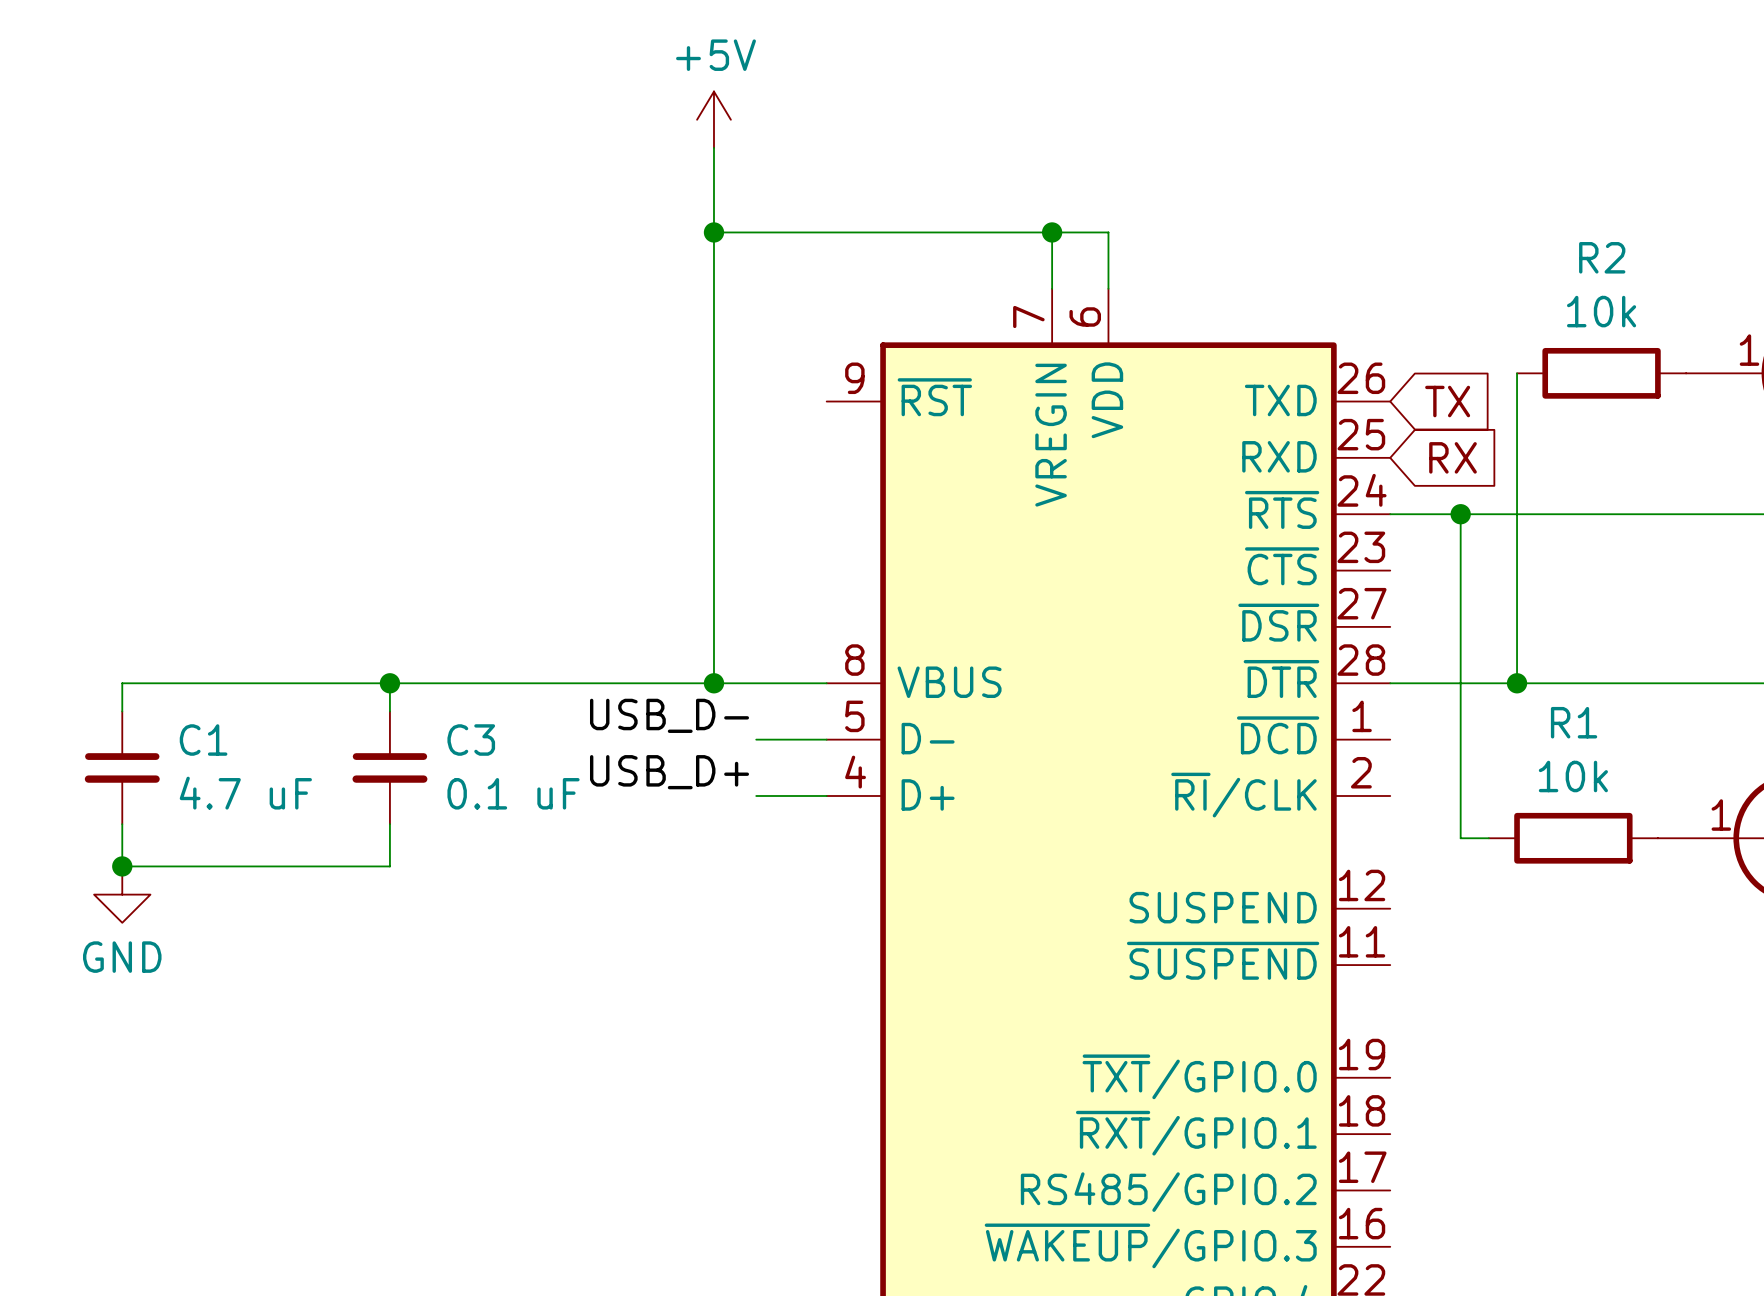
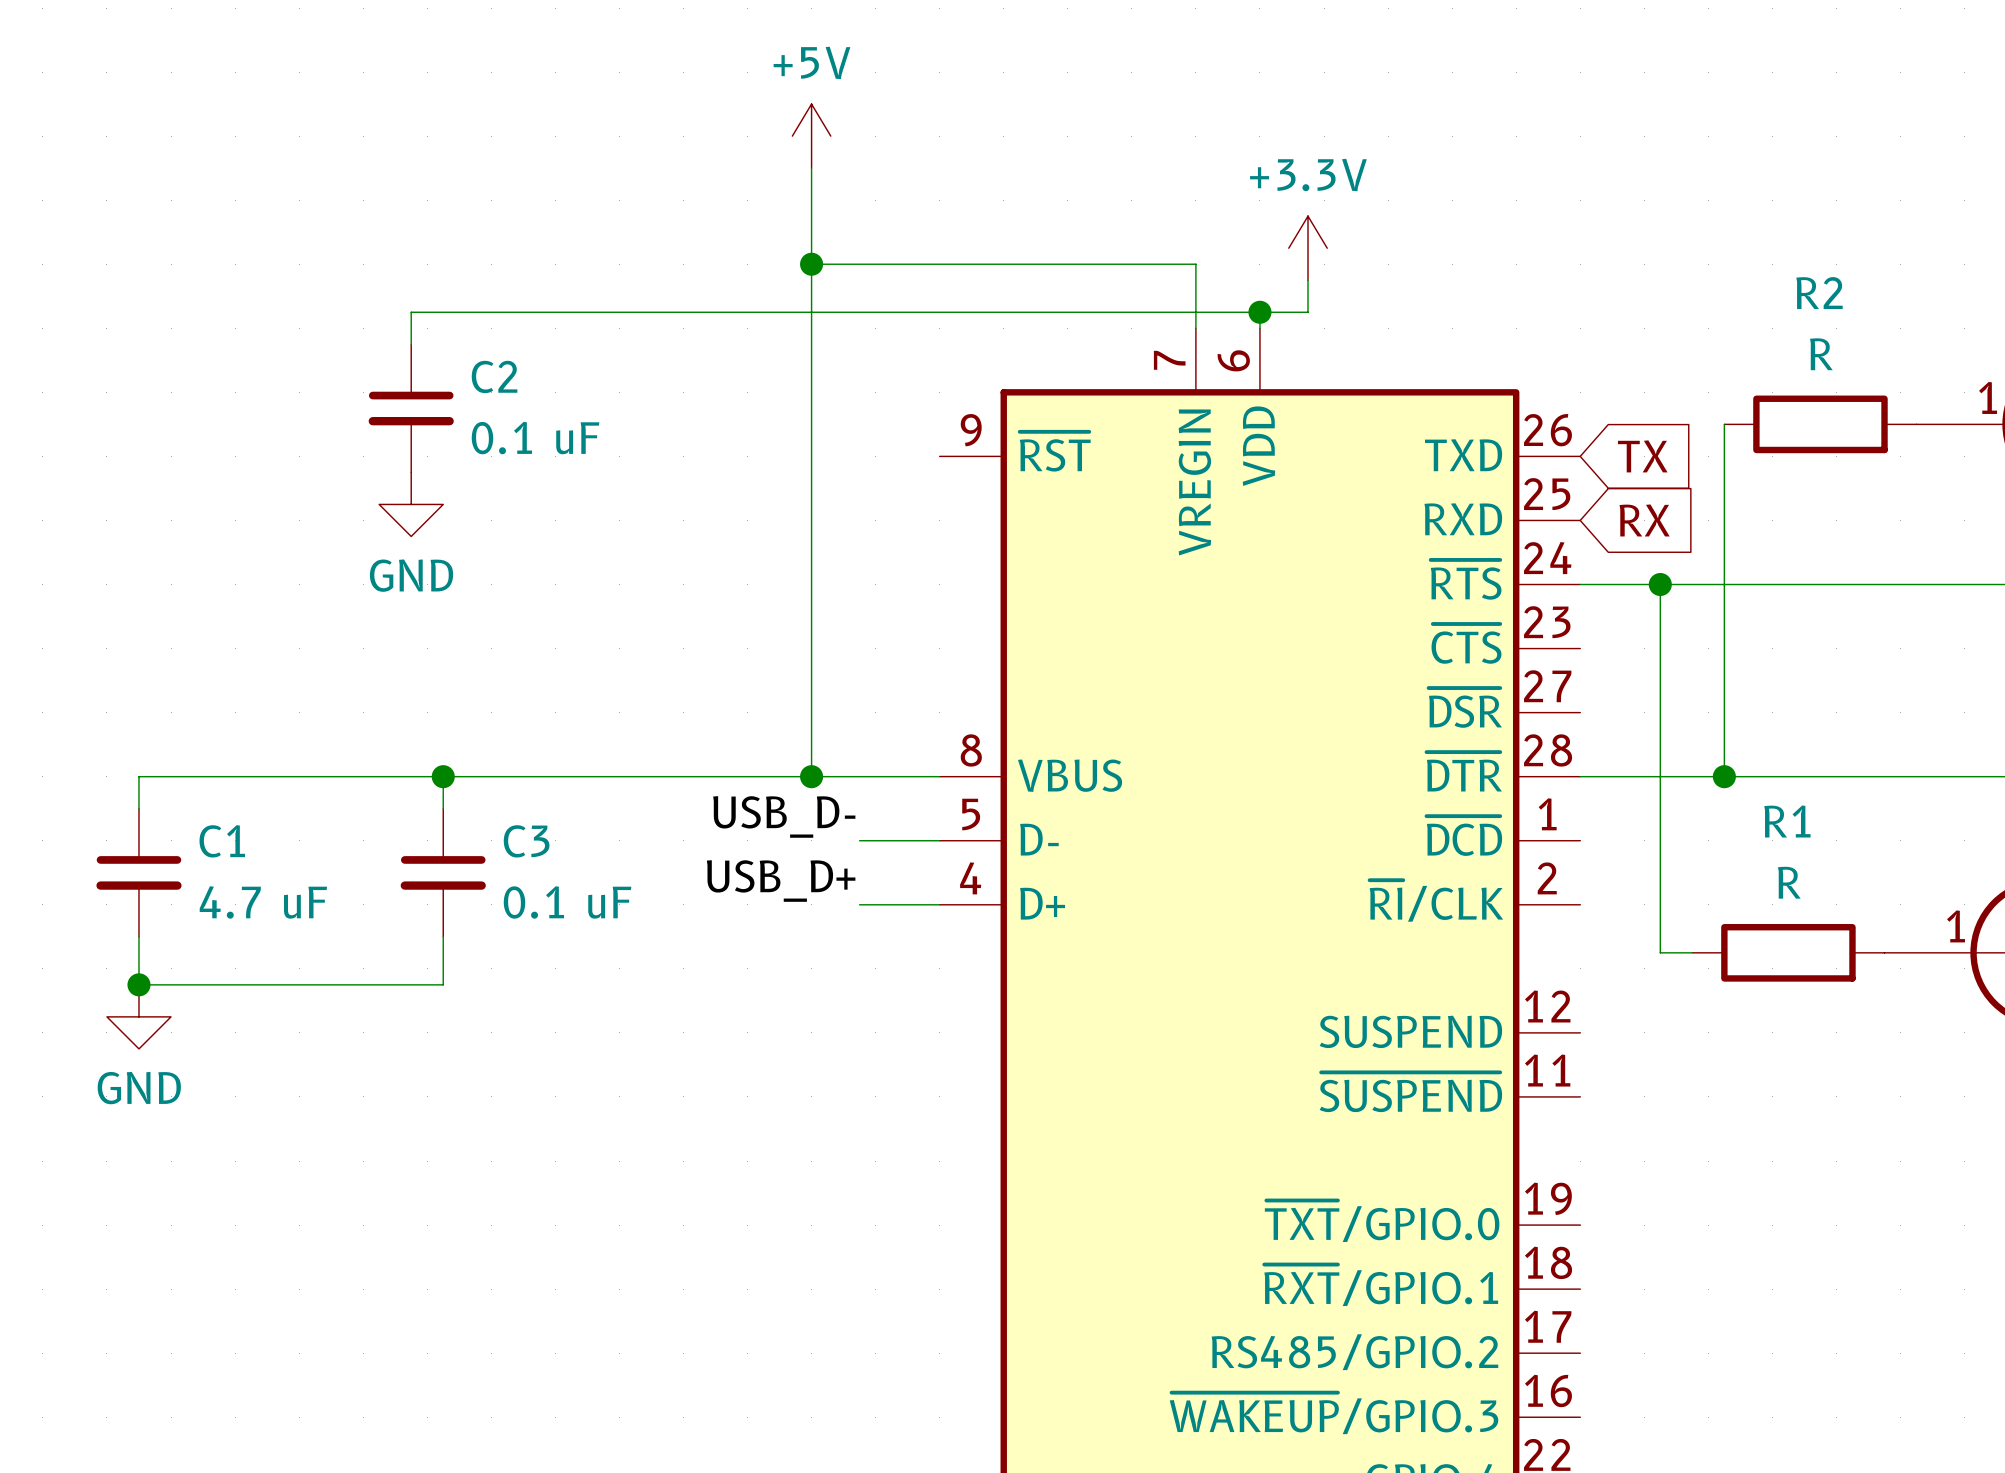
power symbol: none -> +3.3V (1308, 248)
wire: (1052, 232) (1108, 232) (1108, 274) -> none
junction position: (1052, 232) -> (1259, 312)
wire: none -> (1308, 280) (1308, 312) (411, 312) (411, 344)
R2 value: 10k (1601, 311) -> R (1821, 354)
C2: none -> 0.1 uF (411, 408)
power symbol: none -> GND (411, 504)
R1 value: 10k (1573, 776) -> R (1789, 882)

